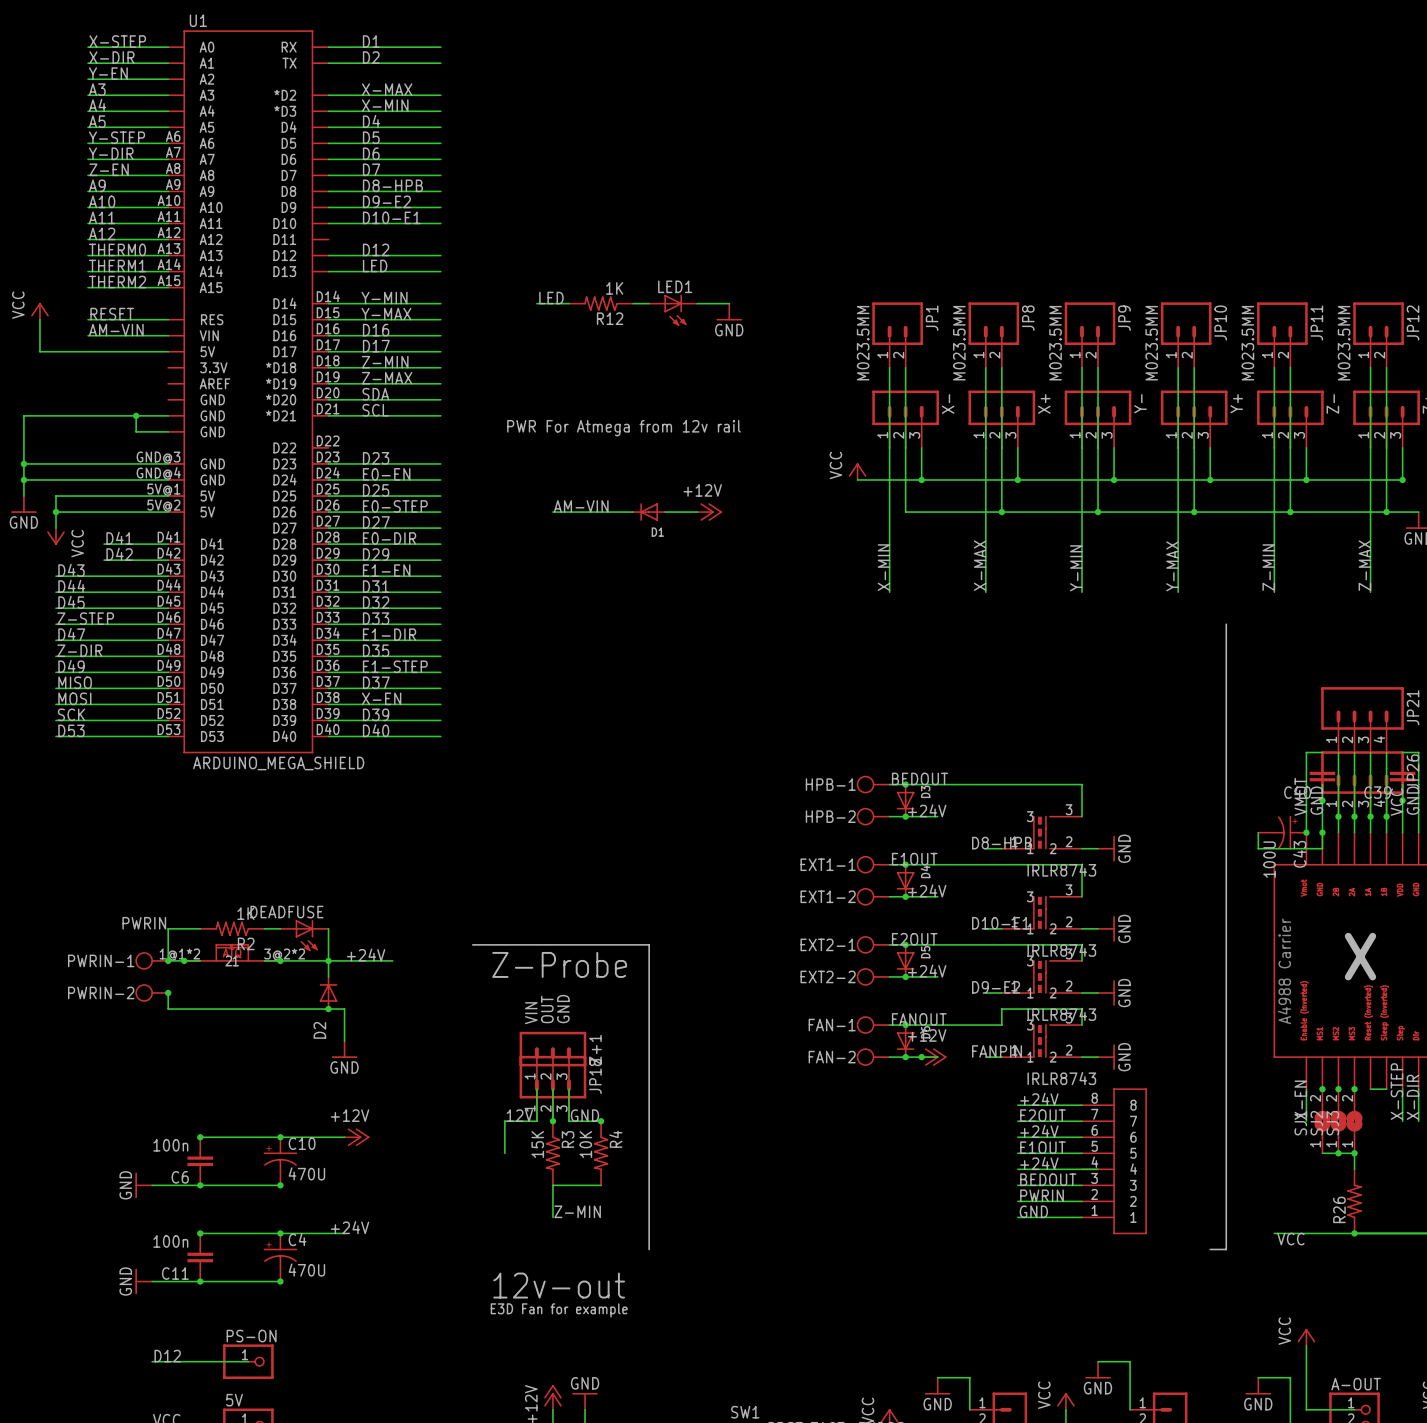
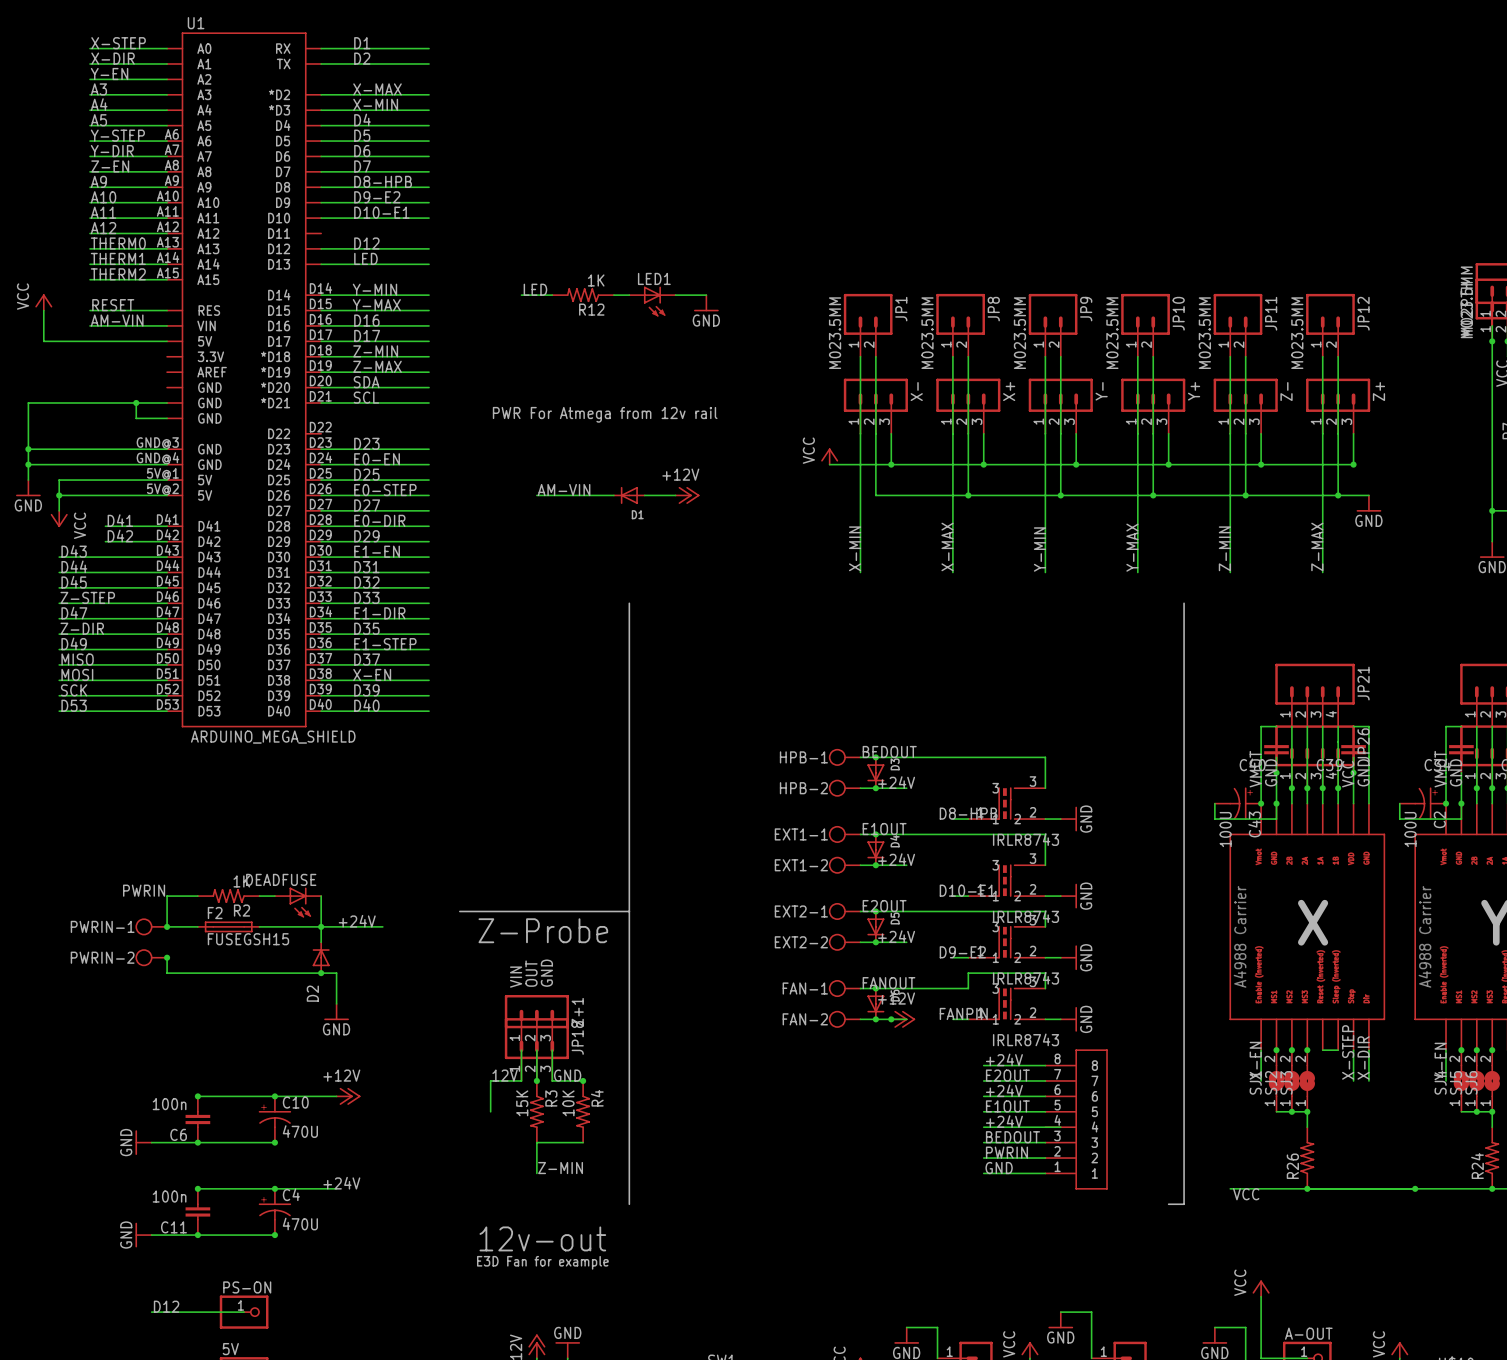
line: none -> (629, 603) (629, 911)
part: (232, 952) -> none
junction: (184, 960) -> none
F2: none -> FUSEGSH15 (228, 926)
junction: (280, 960) -> none

